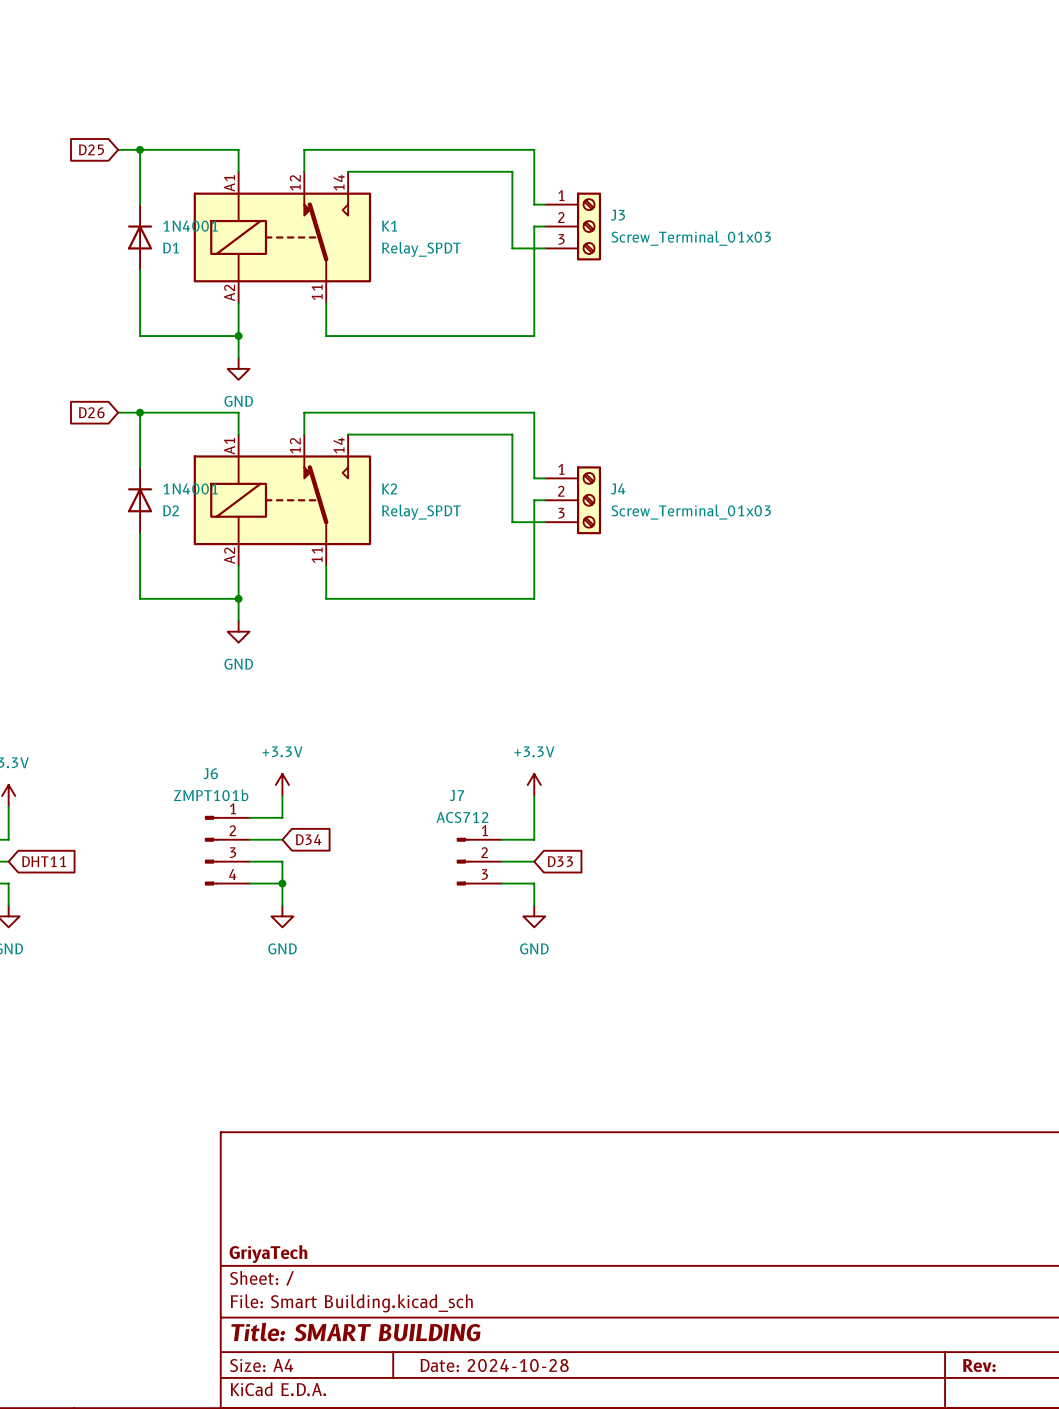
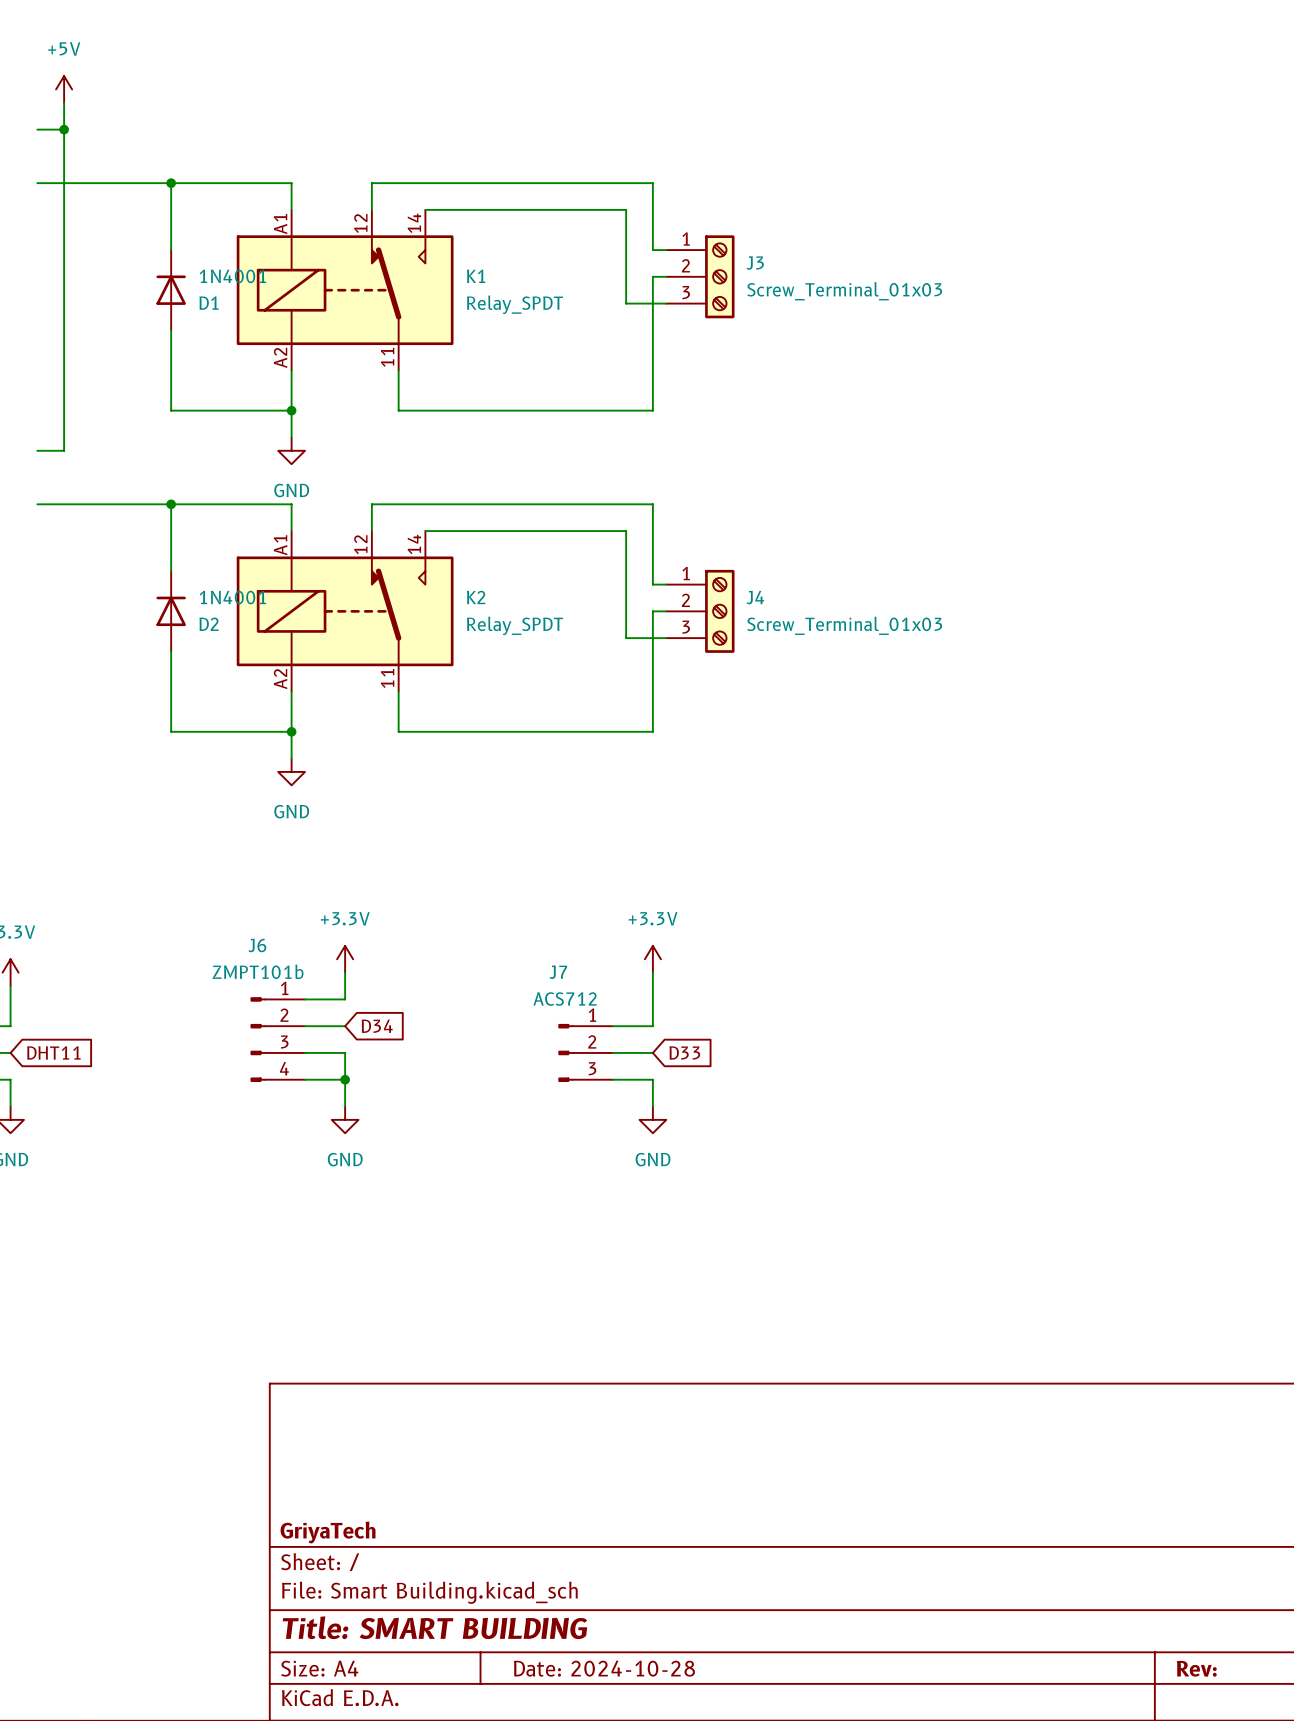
power symbol: none -> +5V (64, 89)
wire: none -> (64, 102) (64, 450) (37, 450)
wire: none -> (37, 129) (64, 129)
junction: none -> (64, 129)
wire: none -> (37, 183) (144, 183)
global label: D25 (91, 149) -> none
wire: none -> (37, 504) (144, 504)
global label: D26 (91, 412) -> none

